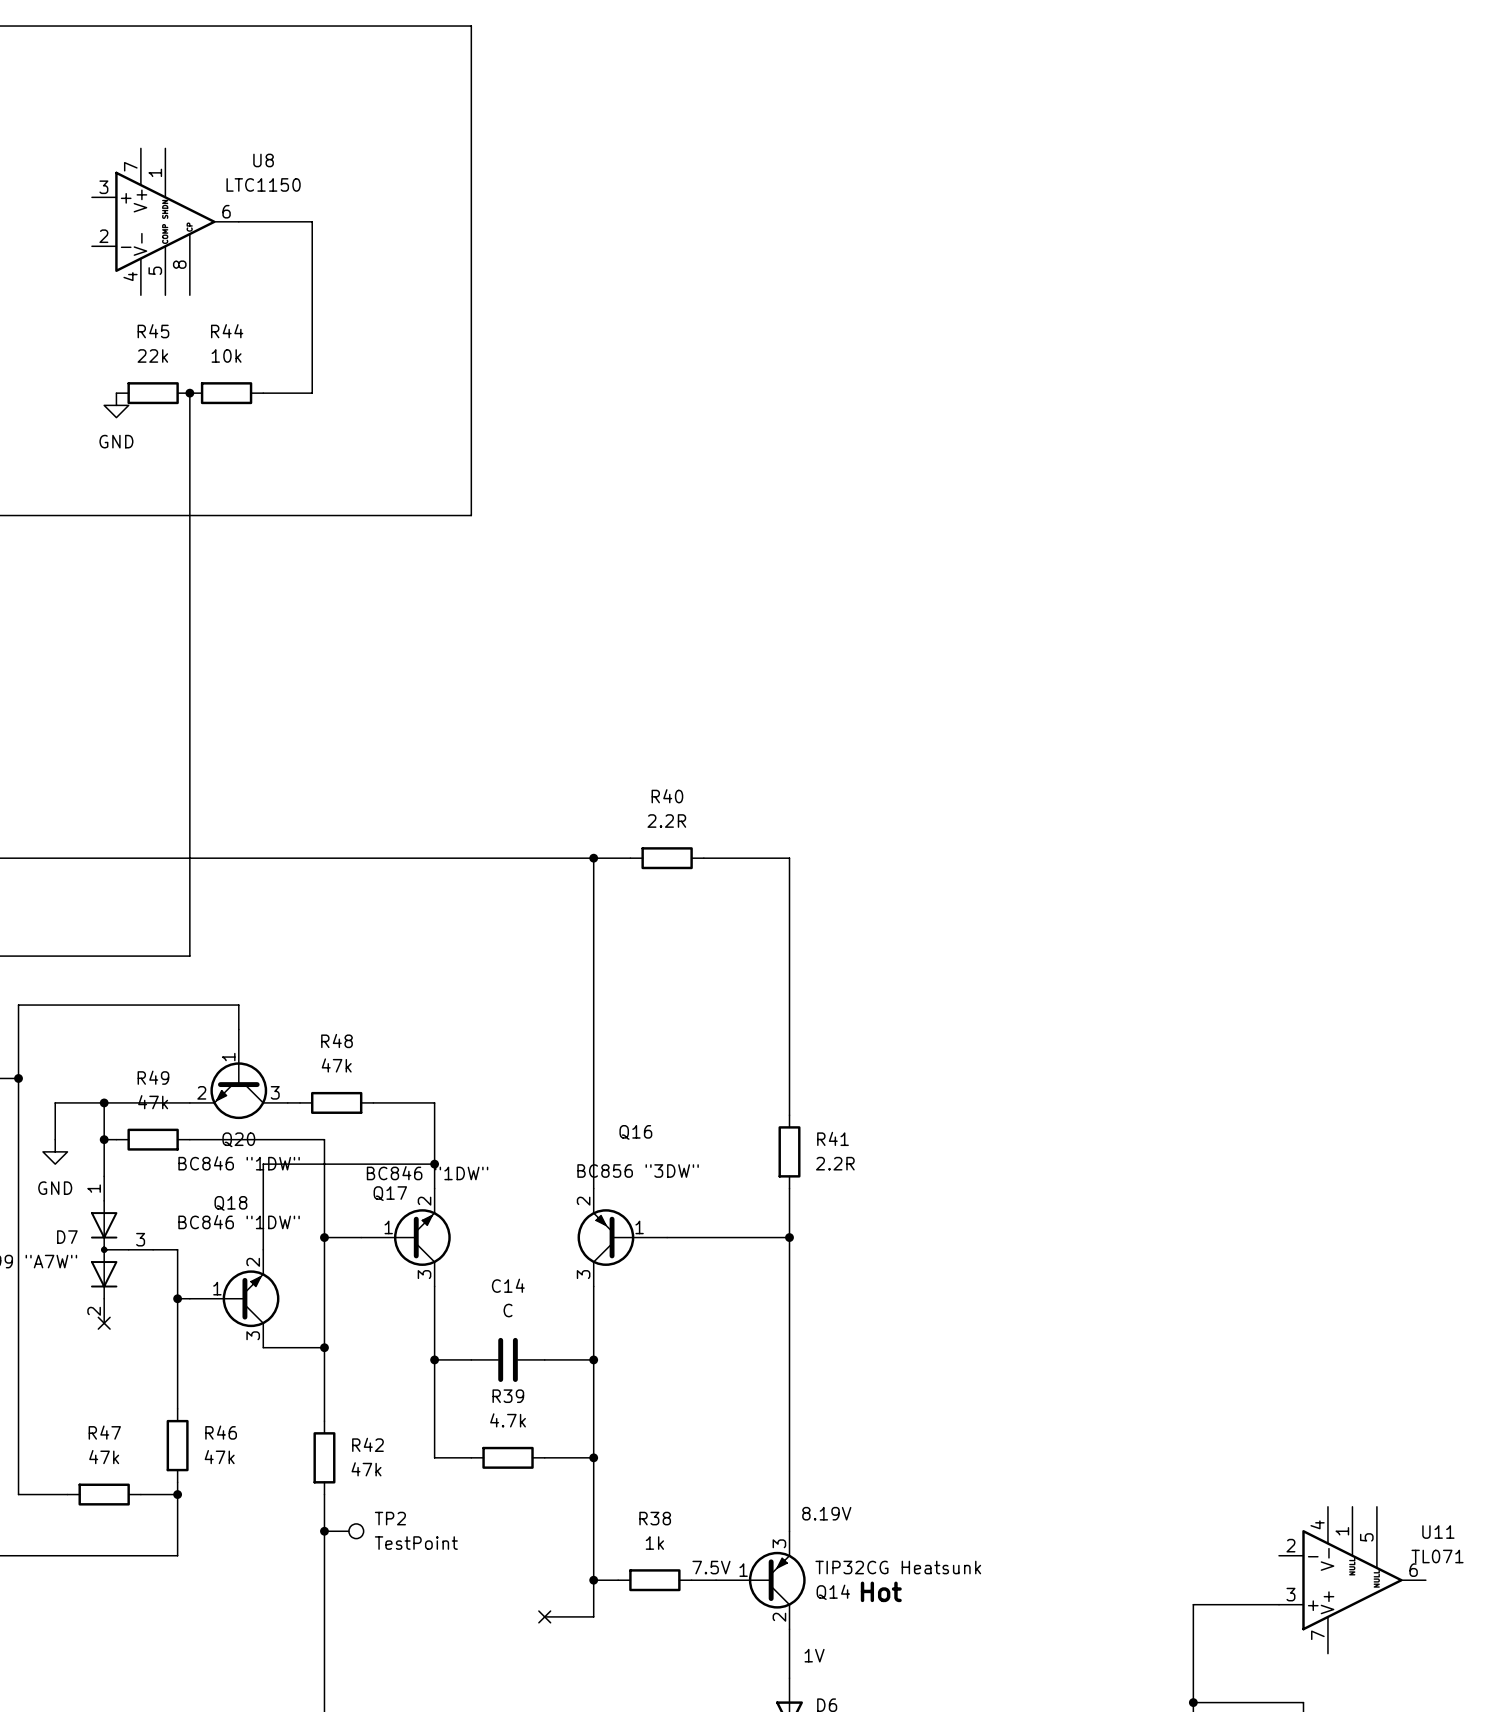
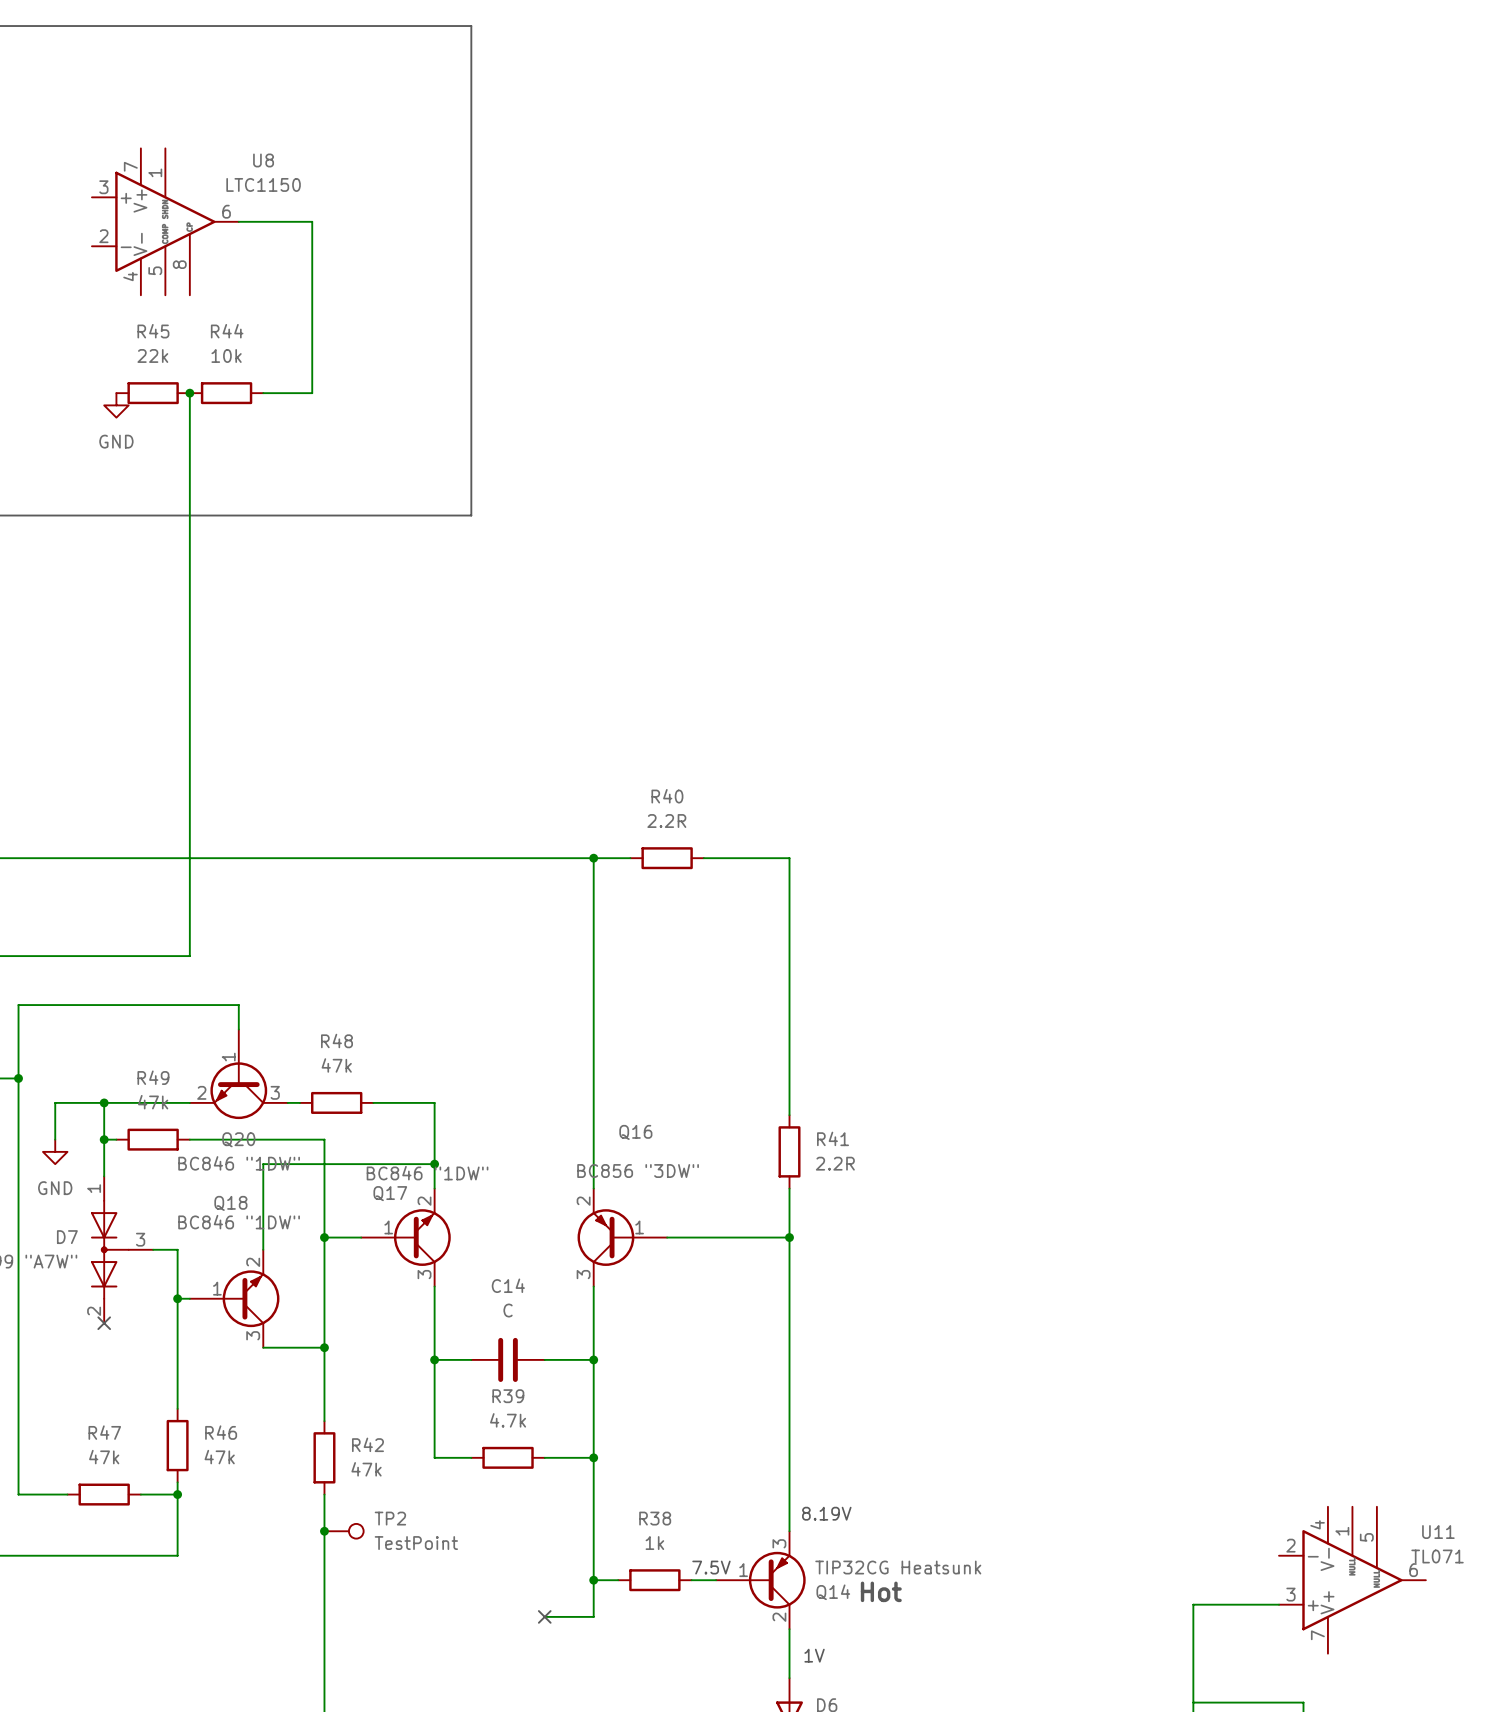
junction: (1193, 1702) -> none

